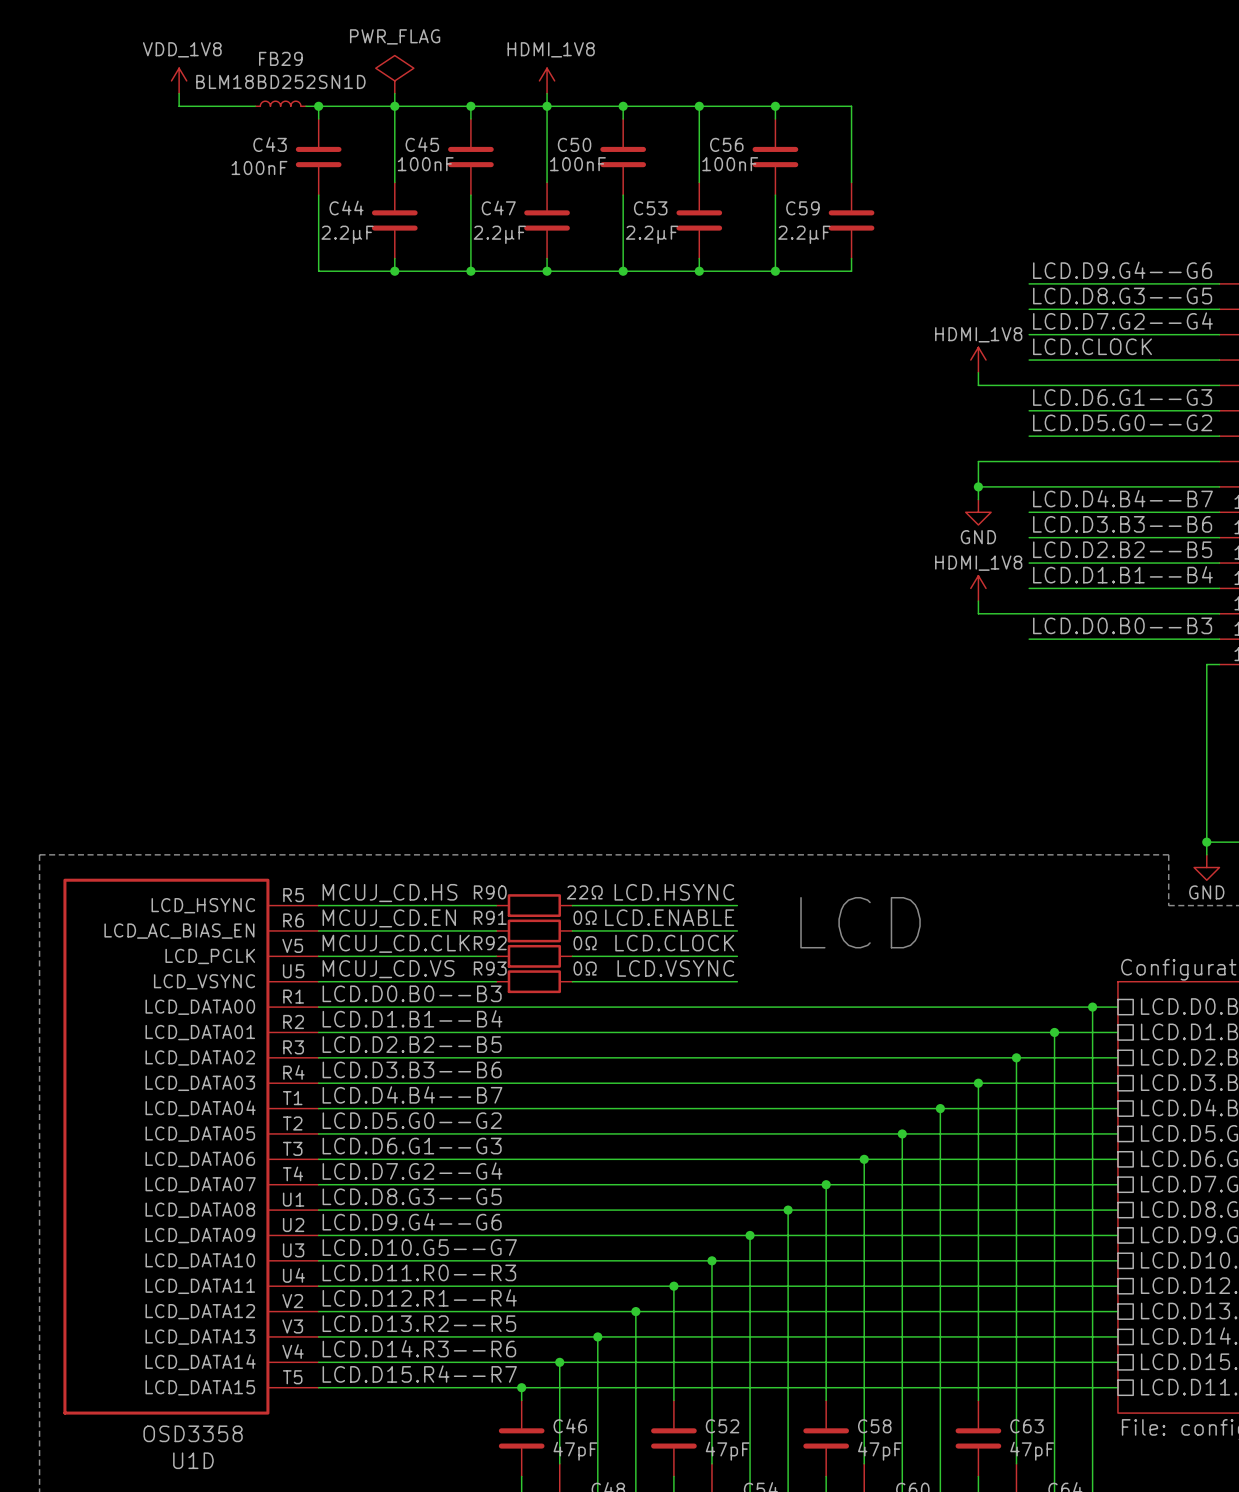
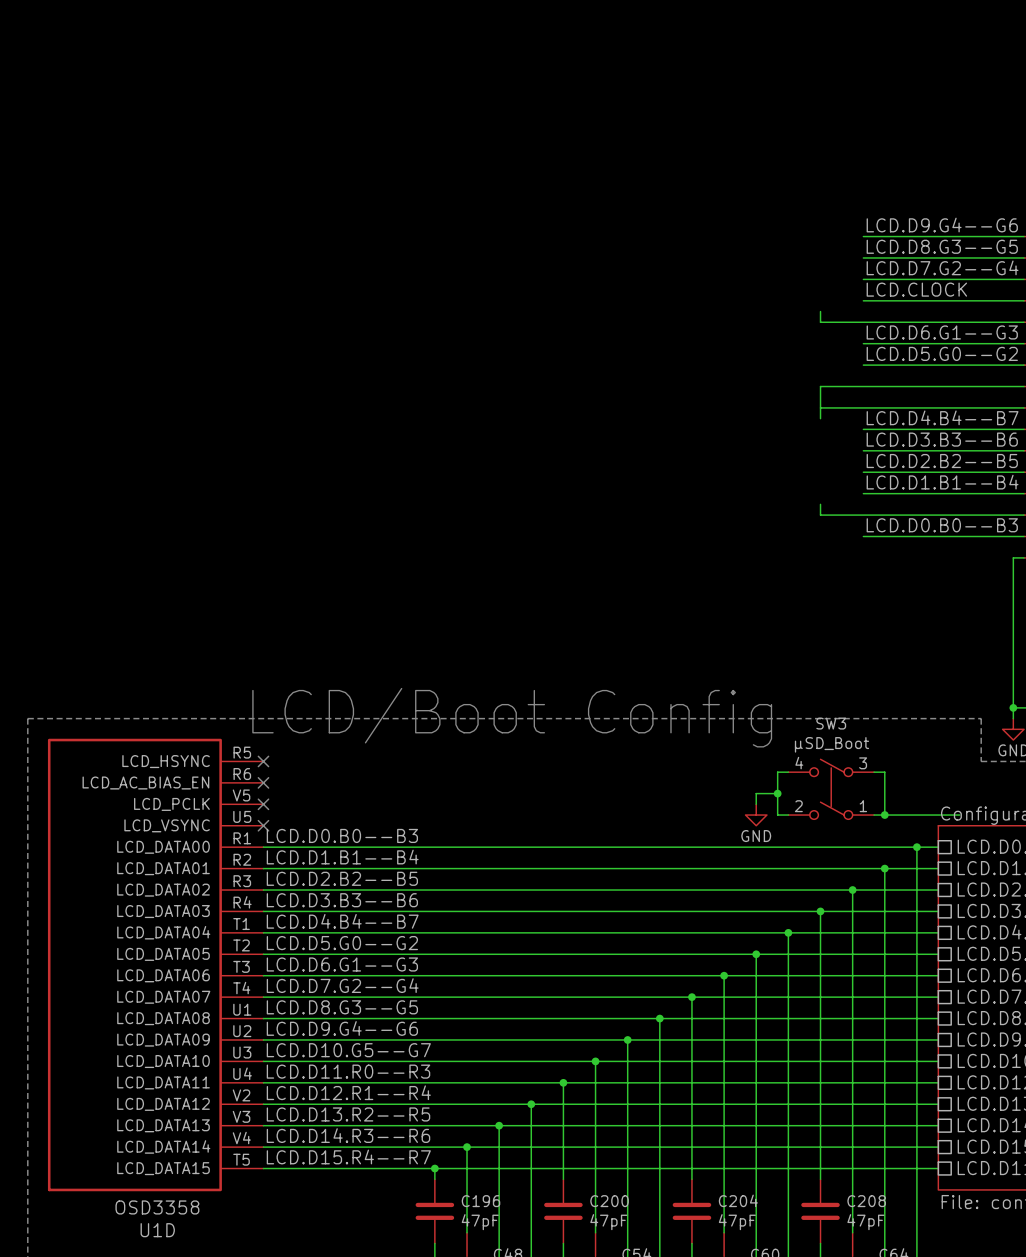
power symbol: PWR_FLAG (394, 74) -> none
power symbol: VDD_1V8 (179, 80) -> none
power symbol: HDMI_1V8 (547, 80) -> none
wire: (179, 93) (179, 106) (255, 106) -> none
wire: (394, 93) (394, 182) -> none
wire: (547, 93) (547, 182) -> none
FB29: BLM18BD252SN1D (280, 103) -> none
wire: (305, 106) (851, 106) (851, 182) -> none
wire: (318, 106) (318, 118) -> none
junction: (318, 106) -> none
junction: (394, 106) -> none
wire: (470, 106) (470, 118) -> none
junction: (470, 106) -> none
junction: (547, 106) -> none
wire: (623, 106) (623, 118) -> none
junction: (623, 106) -> none
wire: (699, 106) (699, 182) -> none
junction: (699, 106) -> none
wire: (775, 106) (775, 118) -> none
junction: (775, 106) -> none
C43: 100nF (318, 157) -> none
C45: 100nF (470, 157) -> none
C50: 100nF (623, 157) -> none
C56: 100nF (775, 157) -> none
wire: (318, 195) (318, 271) (851, 271) (851, 258) -> none
wire: (470, 195) (470, 271) -> none
wire: (623, 195) (623, 271) -> none
wire: (775, 195) (775, 271) -> none
C44: 2.2μF (394, 220) -> none
C47: 2.2μF (547, 220) -> none
C53: 2.2μF (699, 220) -> none
C59: 2.2μF (851, 220) -> none
wire: (394, 258) (394, 271) -> none
wire: (547, 258) (547, 271) -> none
wire: (699, 258) (699, 271) -> none
junction: (394, 271) -> none
junction: (470, 271) -> none
junction: (547, 271) -> none
junction: (623, 271) -> none
junction: (699, 271) -> none
junction: (775, 271) -> none
power symbol: HDMI_1V8 (978, 360) -> none
junction: (978, 486) -> none
power symbol: GND (978, 512) -> none
power symbol: HDMI_1V8 (978, 588) -> none
text: none -> LCD/Boot Config (512, 717)
label: LCD.HSYNC (674, 892) -> none
label: MCUJ_CD.HS (390, 893) -> none
wire: (318, 905) (496, 905) -> none
no-connect mark: none -> (263, 761)
R90: 22Ω (534, 905) -> none
wire: (572, 905) (737, 905) -> none
label: LCD.ENABLE (669, 917) -> none
label: MCUJ_CD.EN (389, 918) -> none
wire: none -> (788, 772) (777, 772) (777, 815) (788, 815)
wire: none -> (874, 772) (884, 772) (884, 815)
text: LCD (860, 922) -> none
wire: (318, 930) (496, 930) -> none
no-connect mark: none -> (263, 782)
R91: 0Ω (534, 930) -> none
wire: (572, 930) (737, 930) -> none
SW3: none -> μSD_Boot (831, 789)
label: MCUJ_CD.CLK (396, 943) -> none
label: LCD.CLOCK (674, 943) -> none
wire: none -> (777, 793) (756, 793) (756, 804)
junction: none -> (777, 793)
wire: (318, 956) (496, 956) -> none
no-connect mark: none -> (263, 804)
R92: 0Ω (534, 956) -> none
wire: (572, 956) (737, 956) -> none
label: LCD.VSYNC (675, 968) -> none
label: MCUJ_CD.VS (388, 969) -> none
power symbol: none -> GND (756, 815)
wire: none -> (874, 815) (959, 815)
junction: none -> (884, 815)
wire: (318, 981) (496, 981) -> none
no-connect mark: none -> (263, 825)
R93: 0Ω (534, 981) -> none
wire: (572, 981) (737, 981) -> none
C46 name: C46 (570, 1426) -> C196 (481, 1201)
C52 name: C52 (722, 1426) -> C200 (609, 1201)
C58 name: C58 (874, 1426) -> C204 (738, 1200)
C63 name: C63 (1027, 1426) -> C208 (866, 1201)

